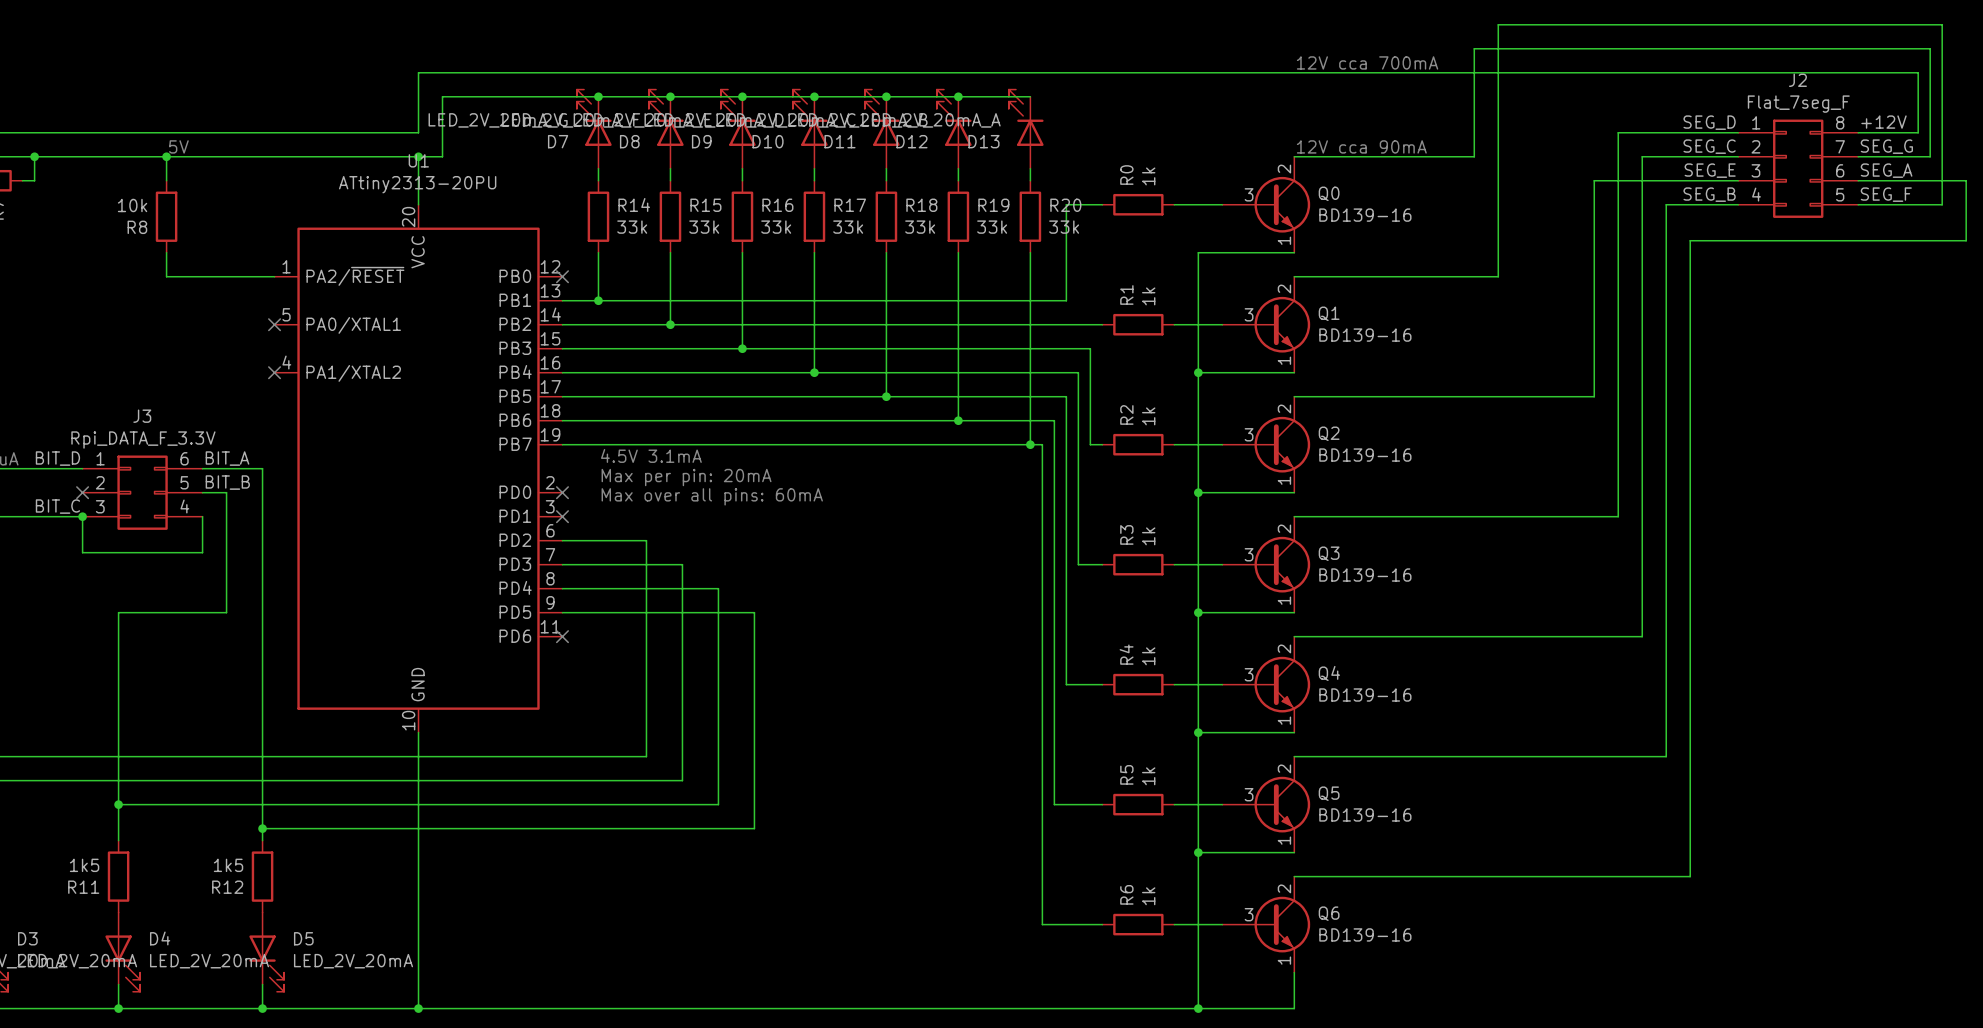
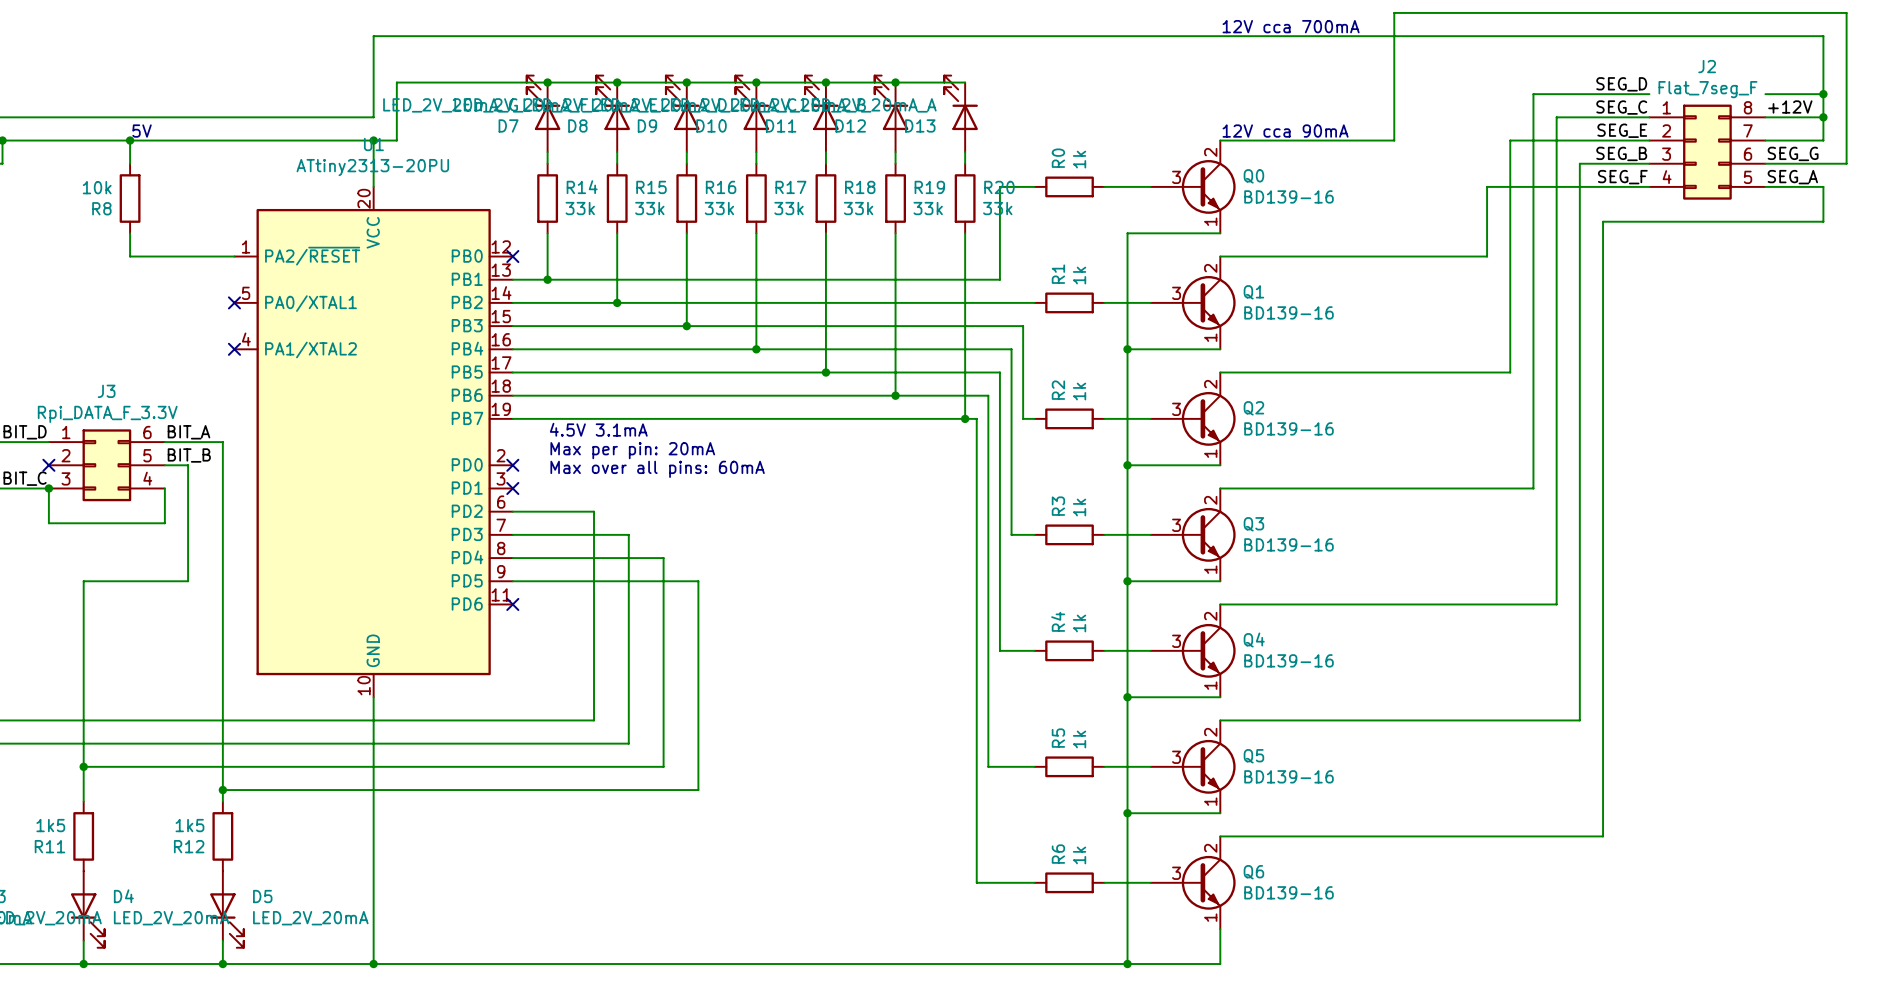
wire: (1498, 24) (1498, 276) -> (1579, 163) (1579, 186) (1487, 186) (1487, 256) (1417, 256)
wire: (1918, 48) (1930, 48) (1930, 156) (1918, 156) -> (1823, 36) (1823, 59)
text position: 12V cca 700mA (1367, 62) -> 12V cca 700mA (1291, 26)
wire: (418, 72) (1918, 72) -> (373, 59) (373, 36) (1394, 36) (1394, 12) (1417, 12)
label: none -> SEG_D (1621, 84)
wire: none -> (1765, 94) (1823, 94)
junction: none -> (1823, 94)
label: SEG_D (1709, 122) -> SEG_C (1621, 107)
wire: (1618, 132) (1642, 132) -> (1533, 117) (1533, 94) (1649, 94)
wire: none -> (1823, 117) (1823, 140)
junction: none -> (1823, 117)
label: SEG_C (1709, 146) -> SEG_E (1622, 130)
label: SEG_G (1886, 146) -> none
label: SEG_E (1710, 170) -> SEG_B (1621, 153)
label: SEG_A (1886, 170) -> SEG_G (1793, 153)
wire: (1594, 180) (1666, 180) -> (1510, 163) (1510, 140) (1556, 140) (1556, 117)
label: SEG_B (1709, 194) -> SEG_F (1622, 177)
label: SEG_F (1886, 194) -> SEG_A (1792, 177)
wire: (1918, 204) (1942, 204) (1942, 180) (1966, 180) (1966, 240) (1918, 240) -> (1823, 186) (1823, 221)

